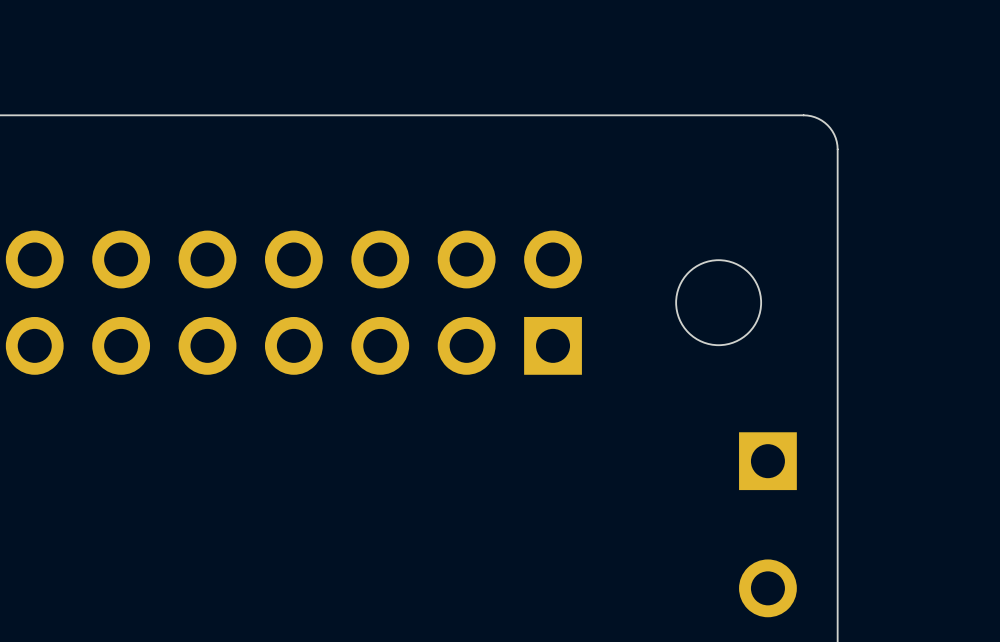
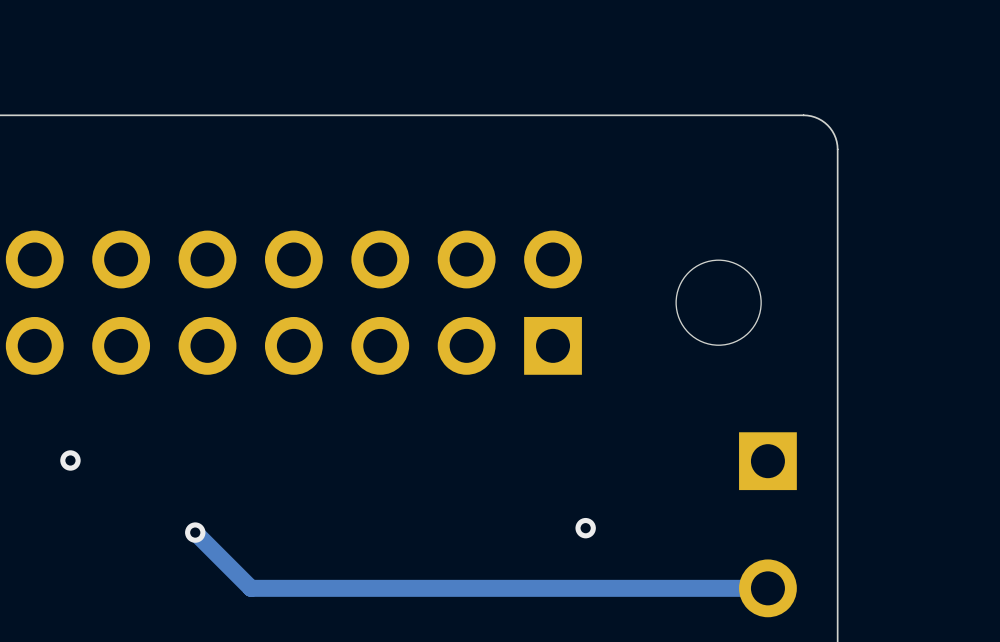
via: none -> (70, 460)
via: none -> (585, 528)
track: none -> (195, 532) (251, 588) (767, 588)
via: none -> (195, 532)

